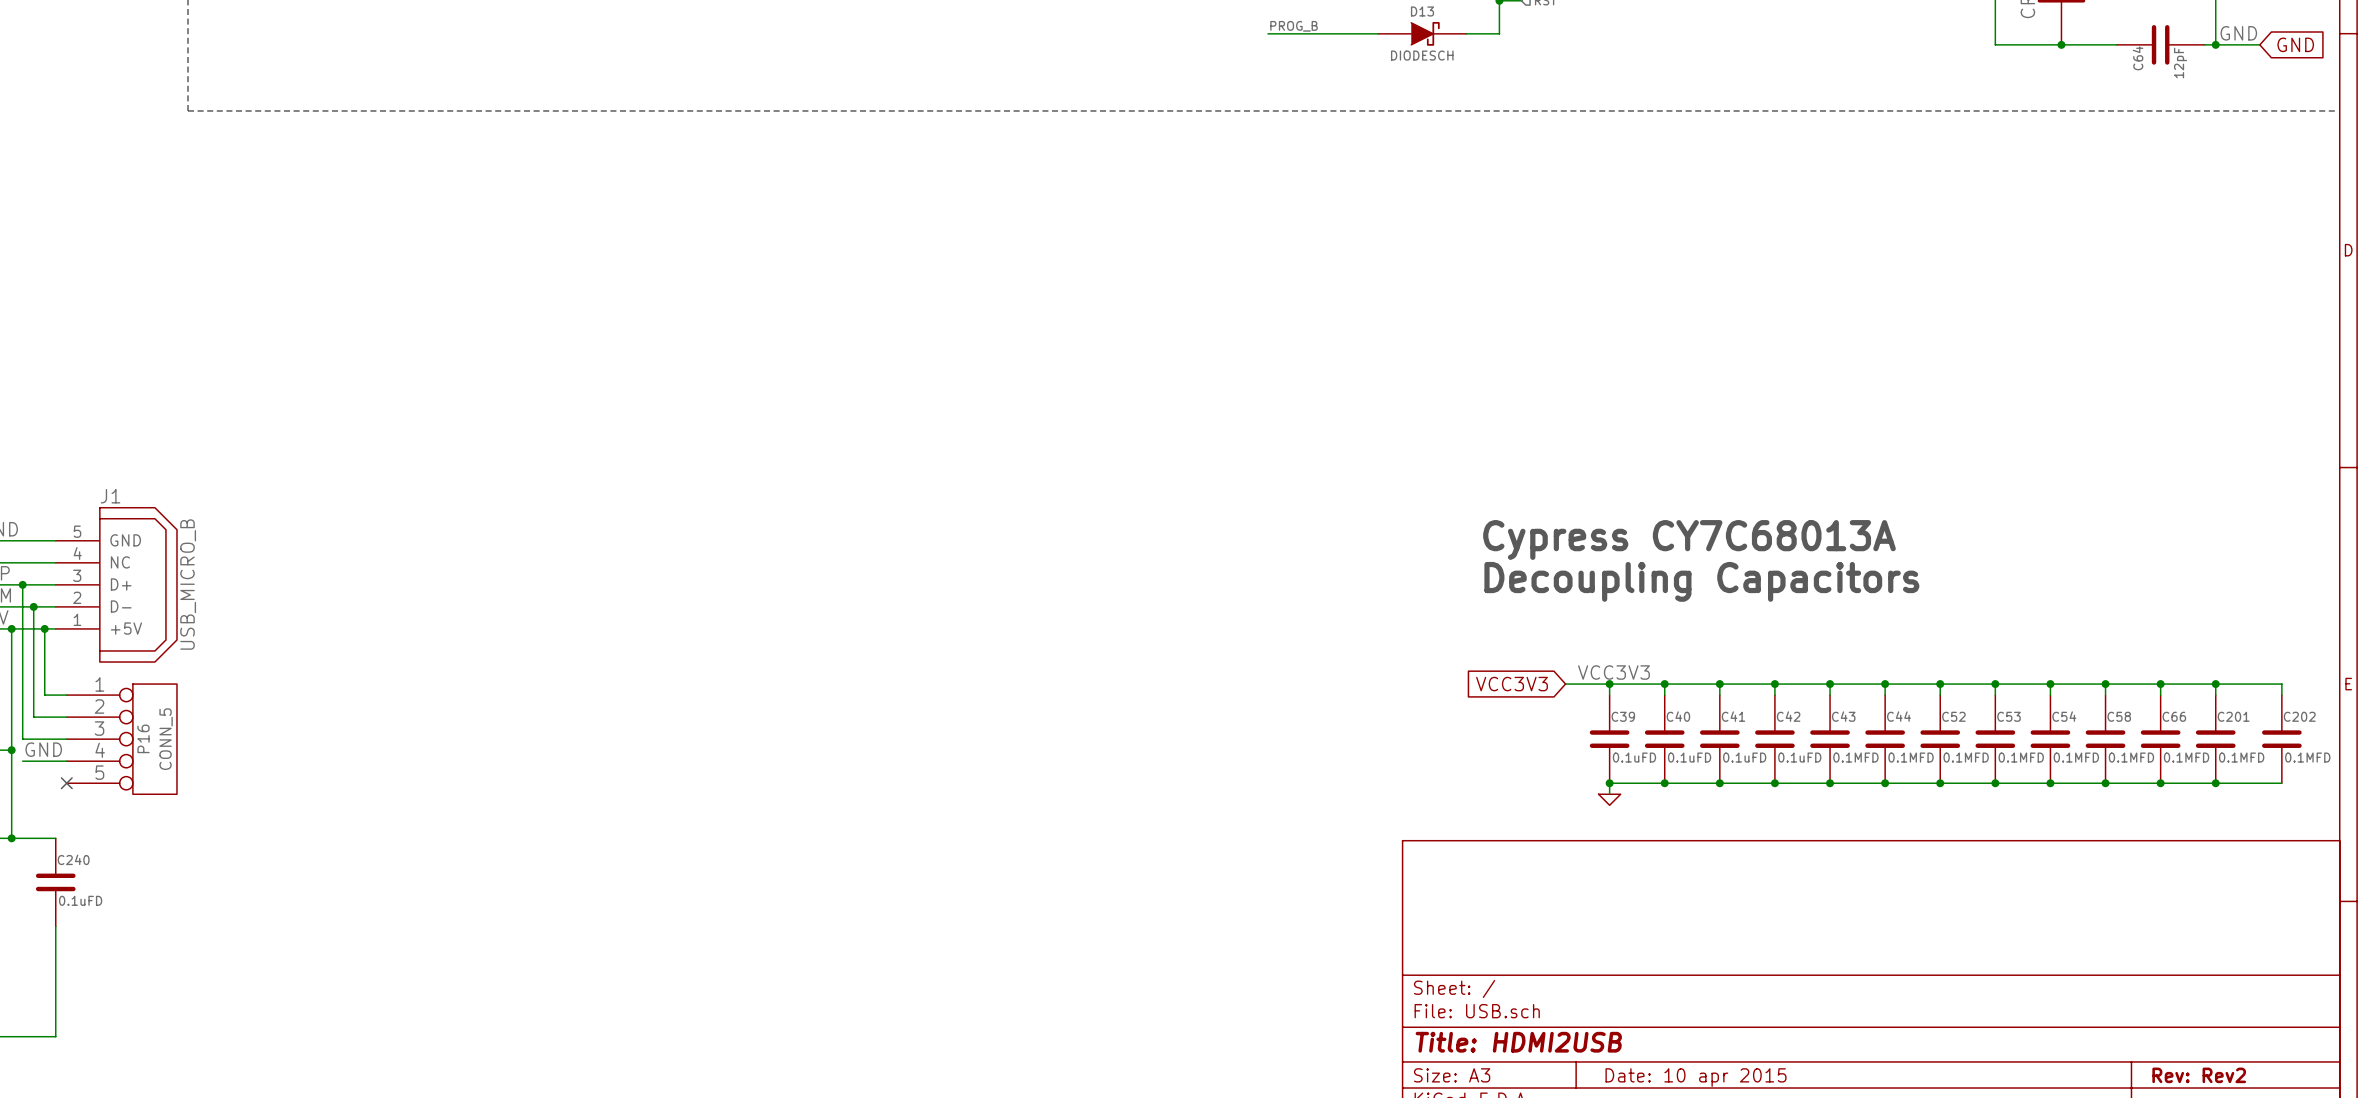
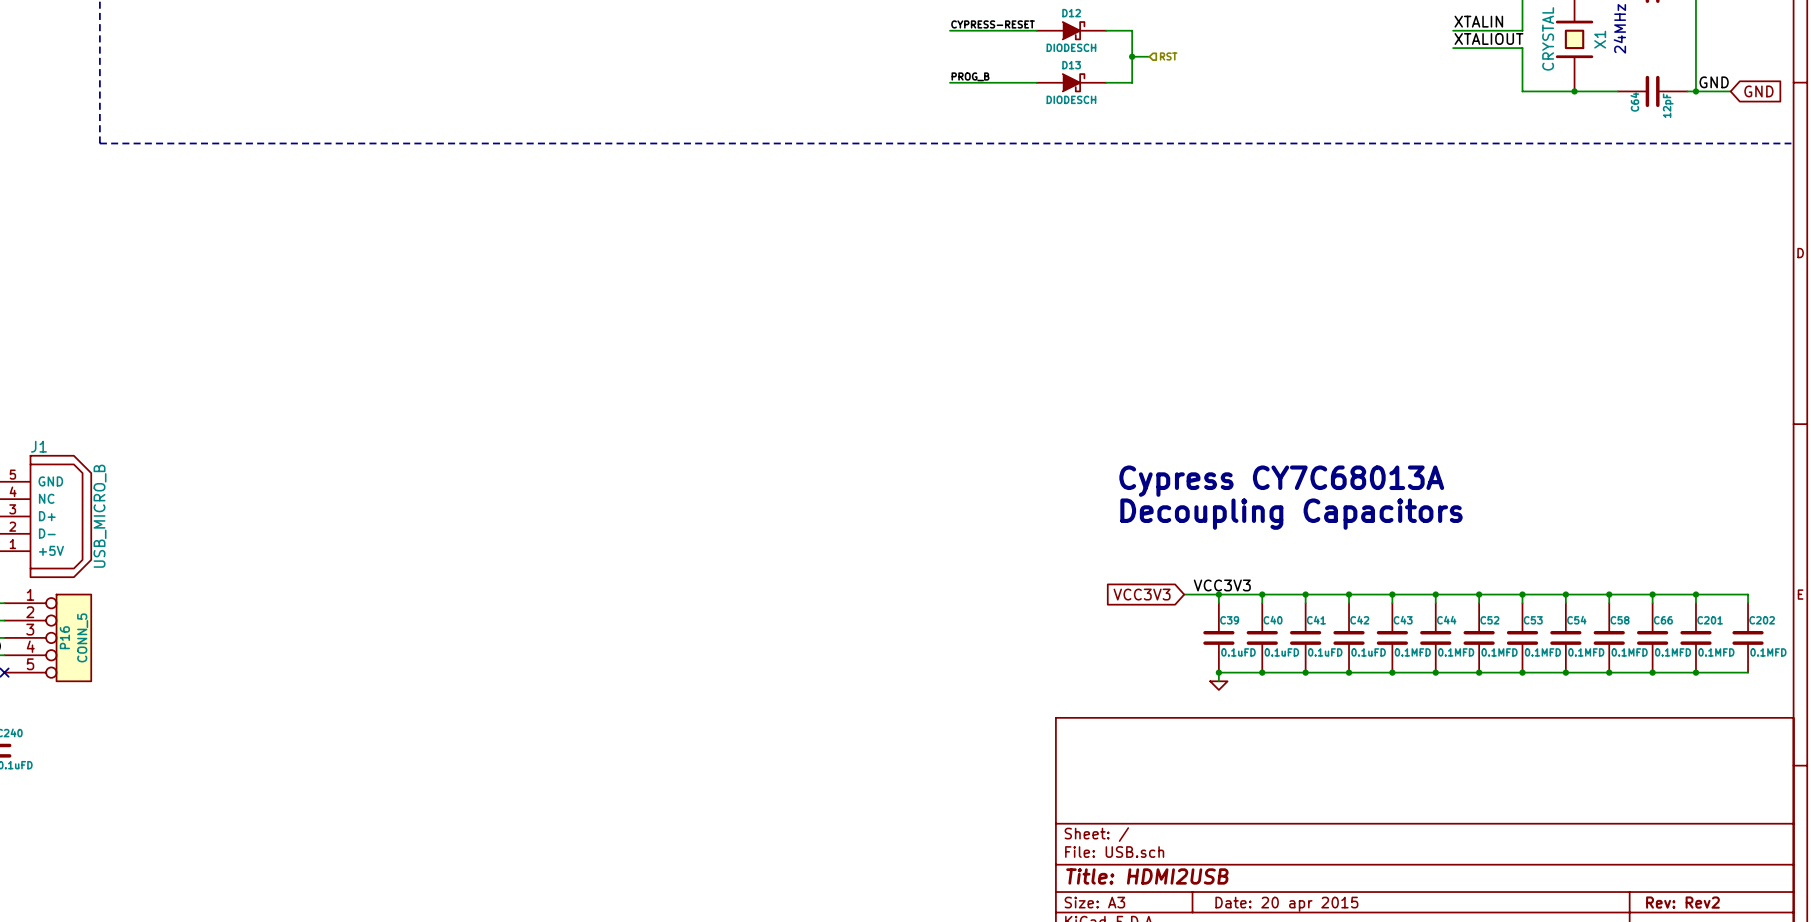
title block: Date: 10 apr 2015 (1696, 1077) -> Date: 20 apr 2015 (1286, 904)

